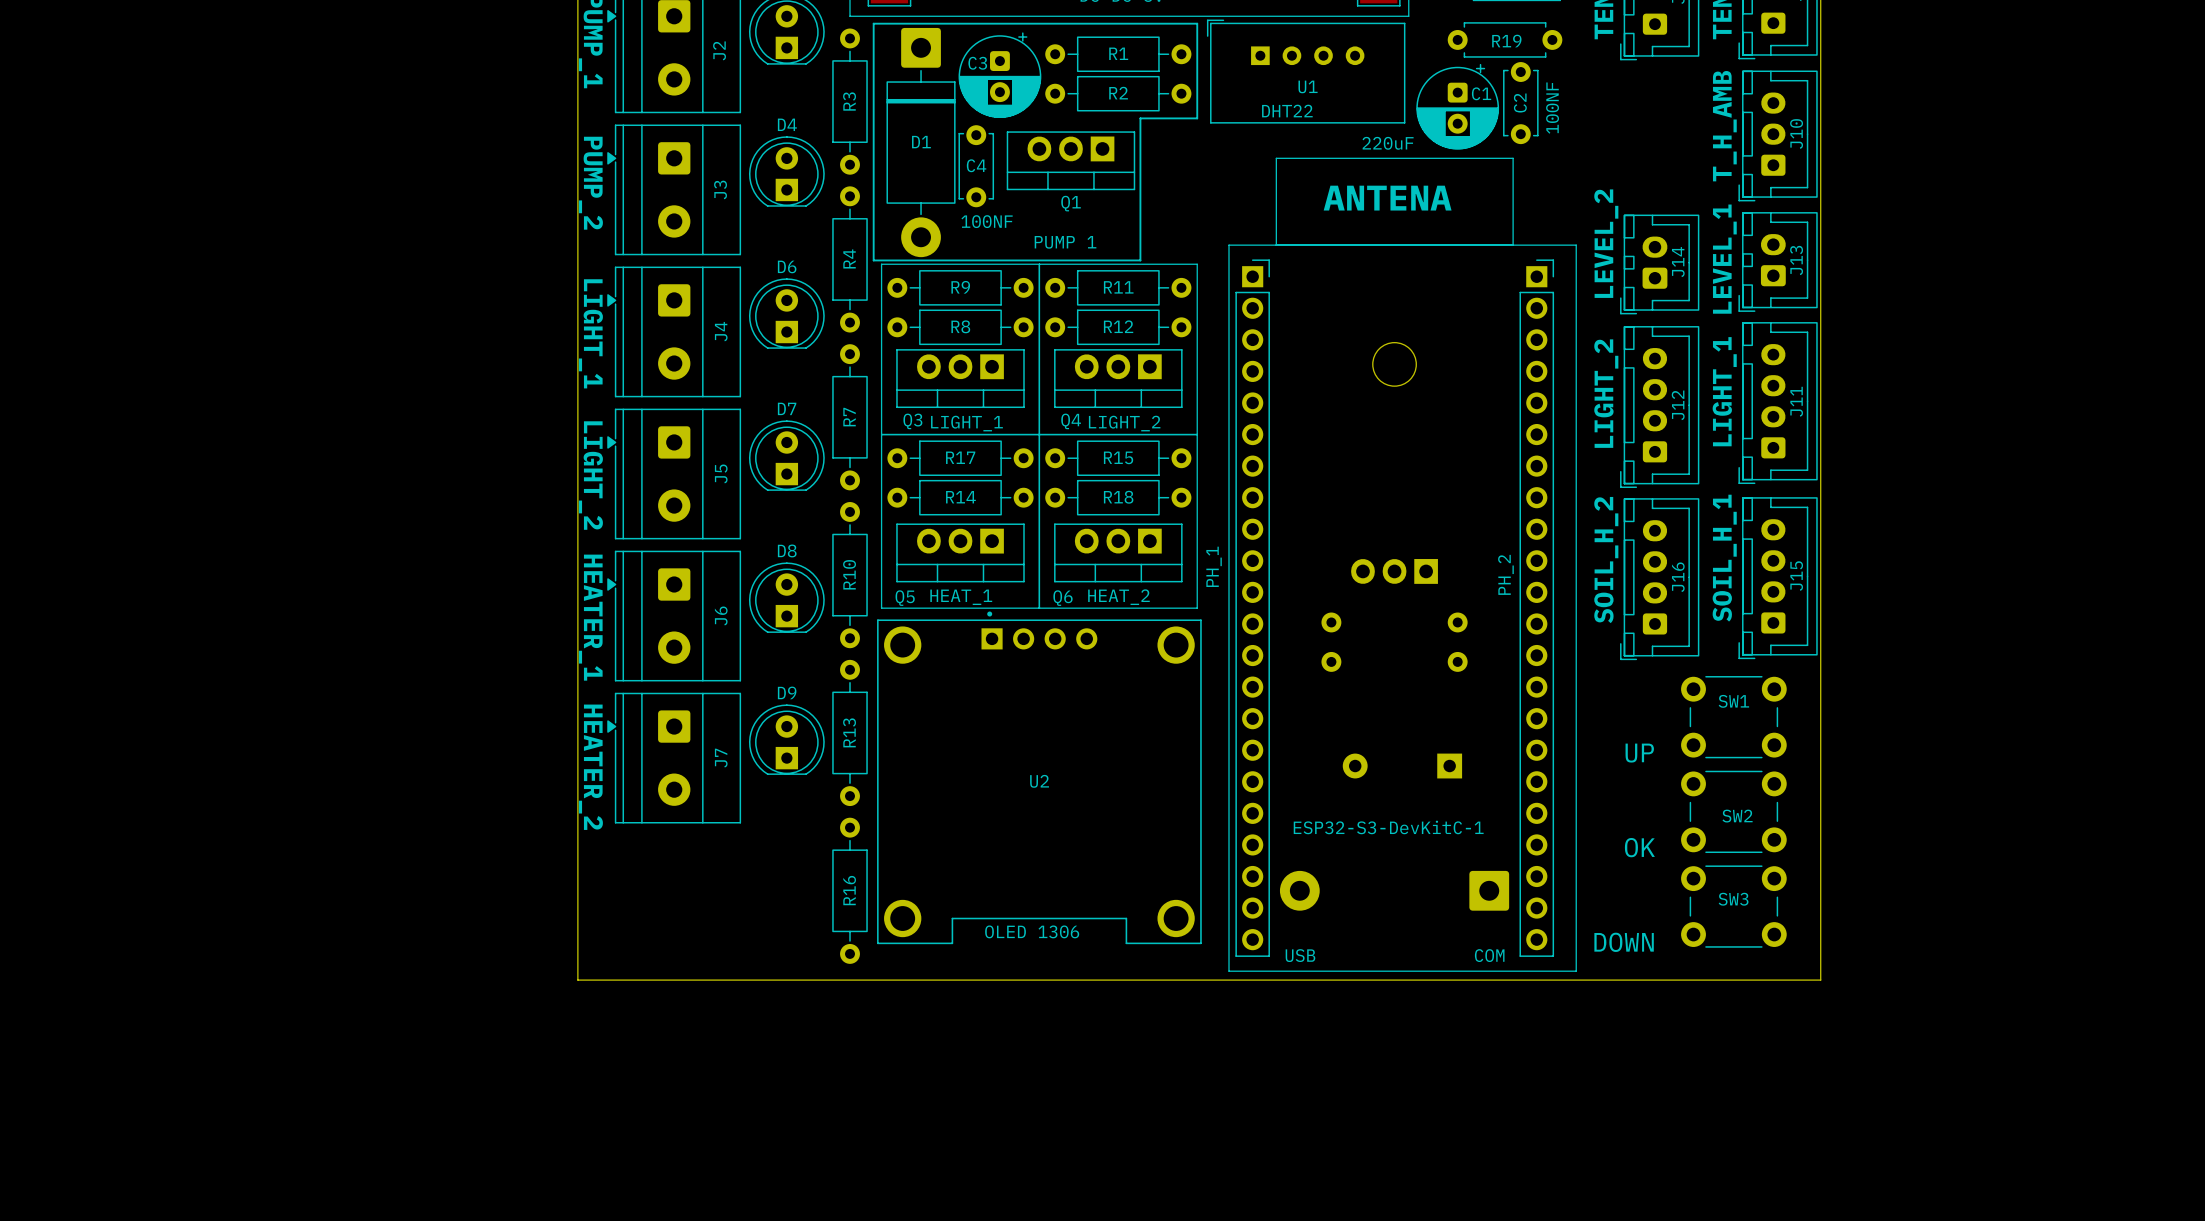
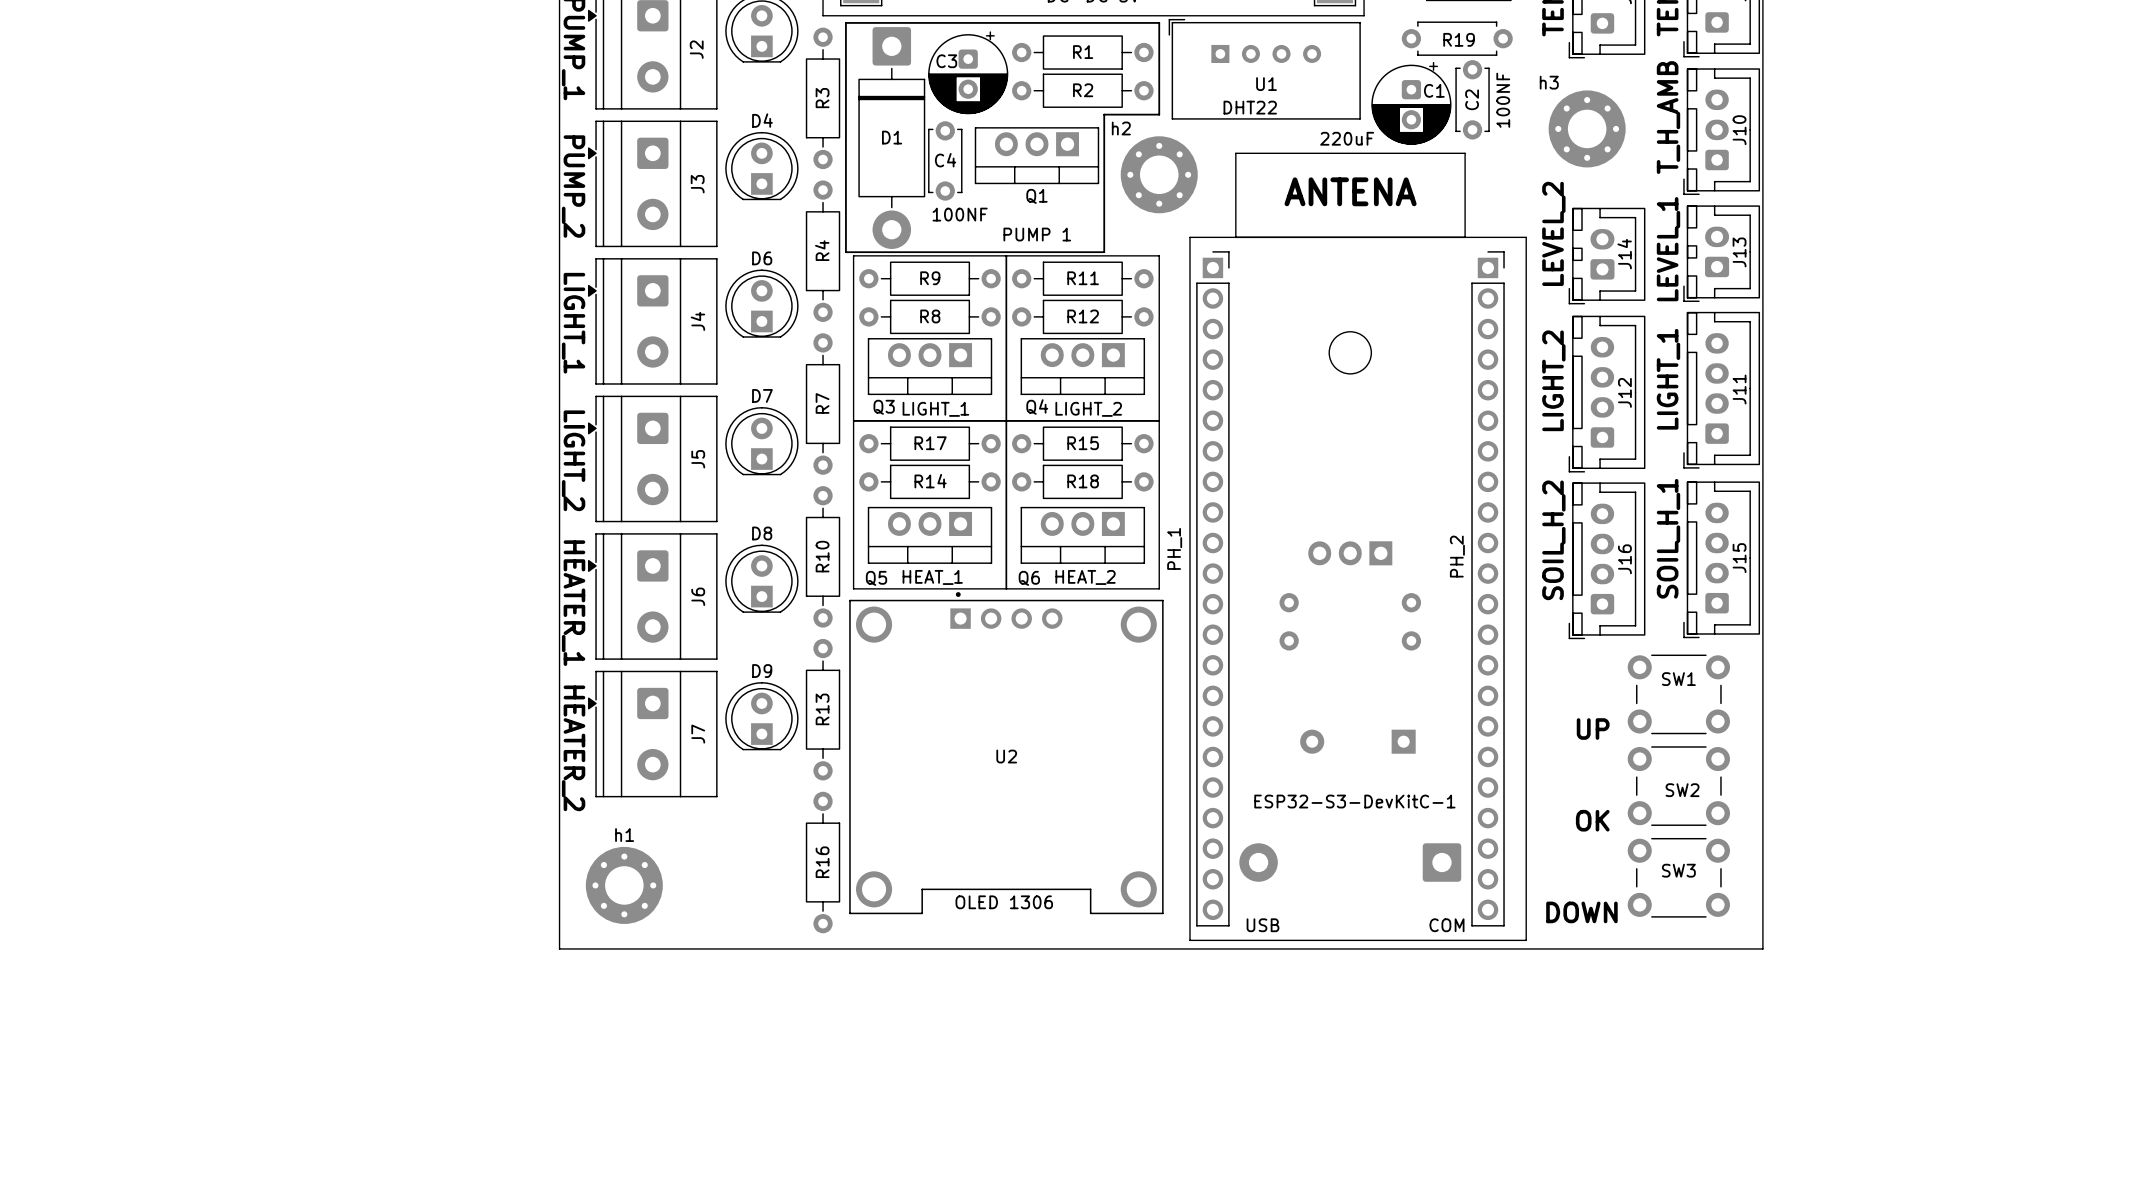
h3: none -> (1587, 128)
h2: none -> (1159, 174)
h1: none -> (624, 885)

